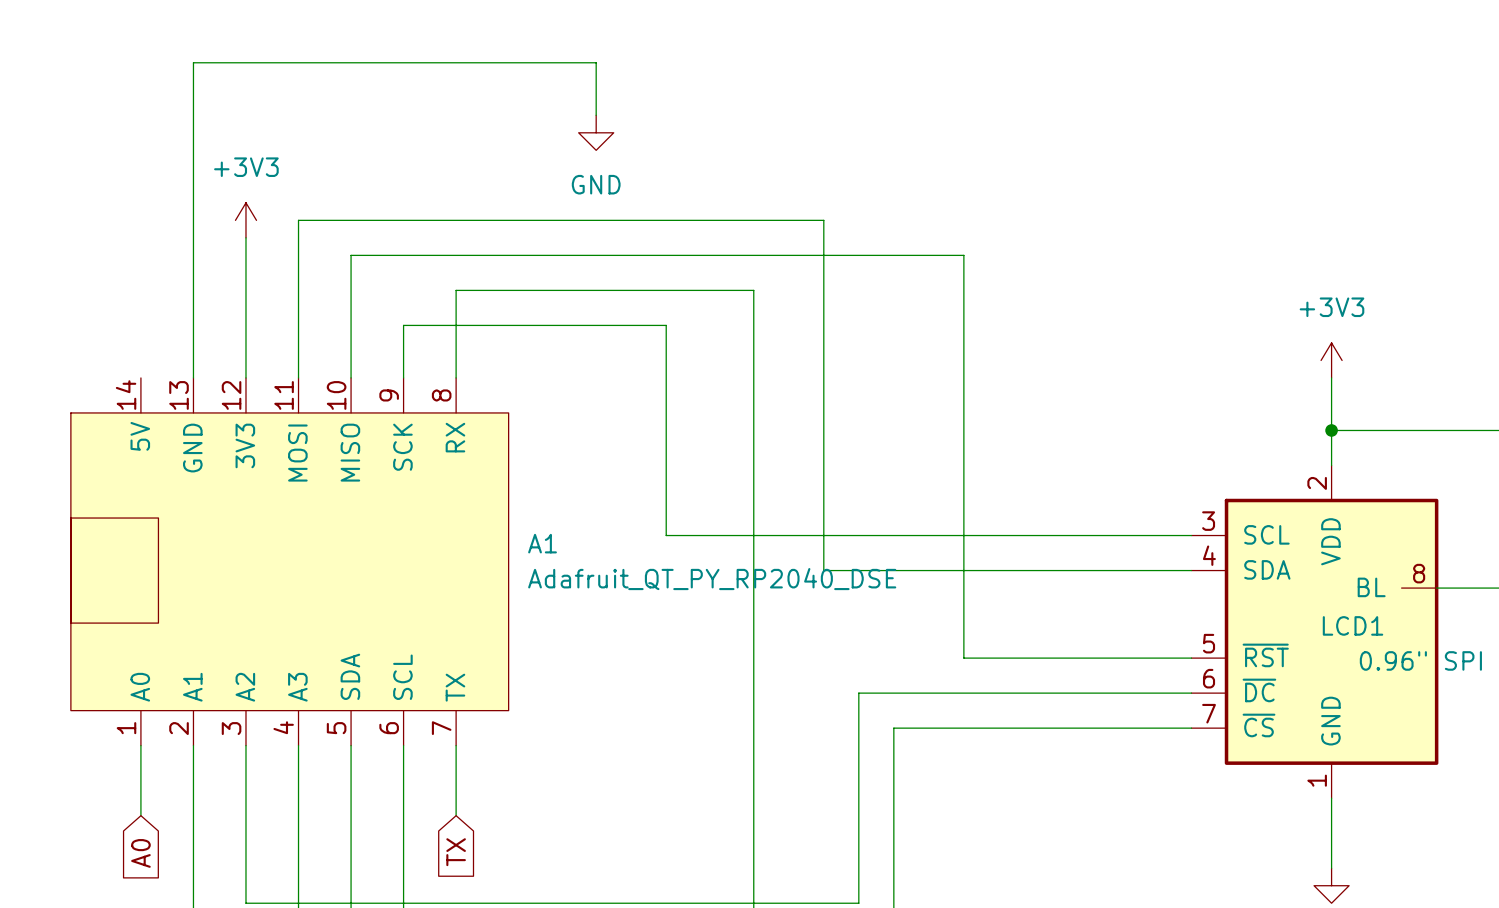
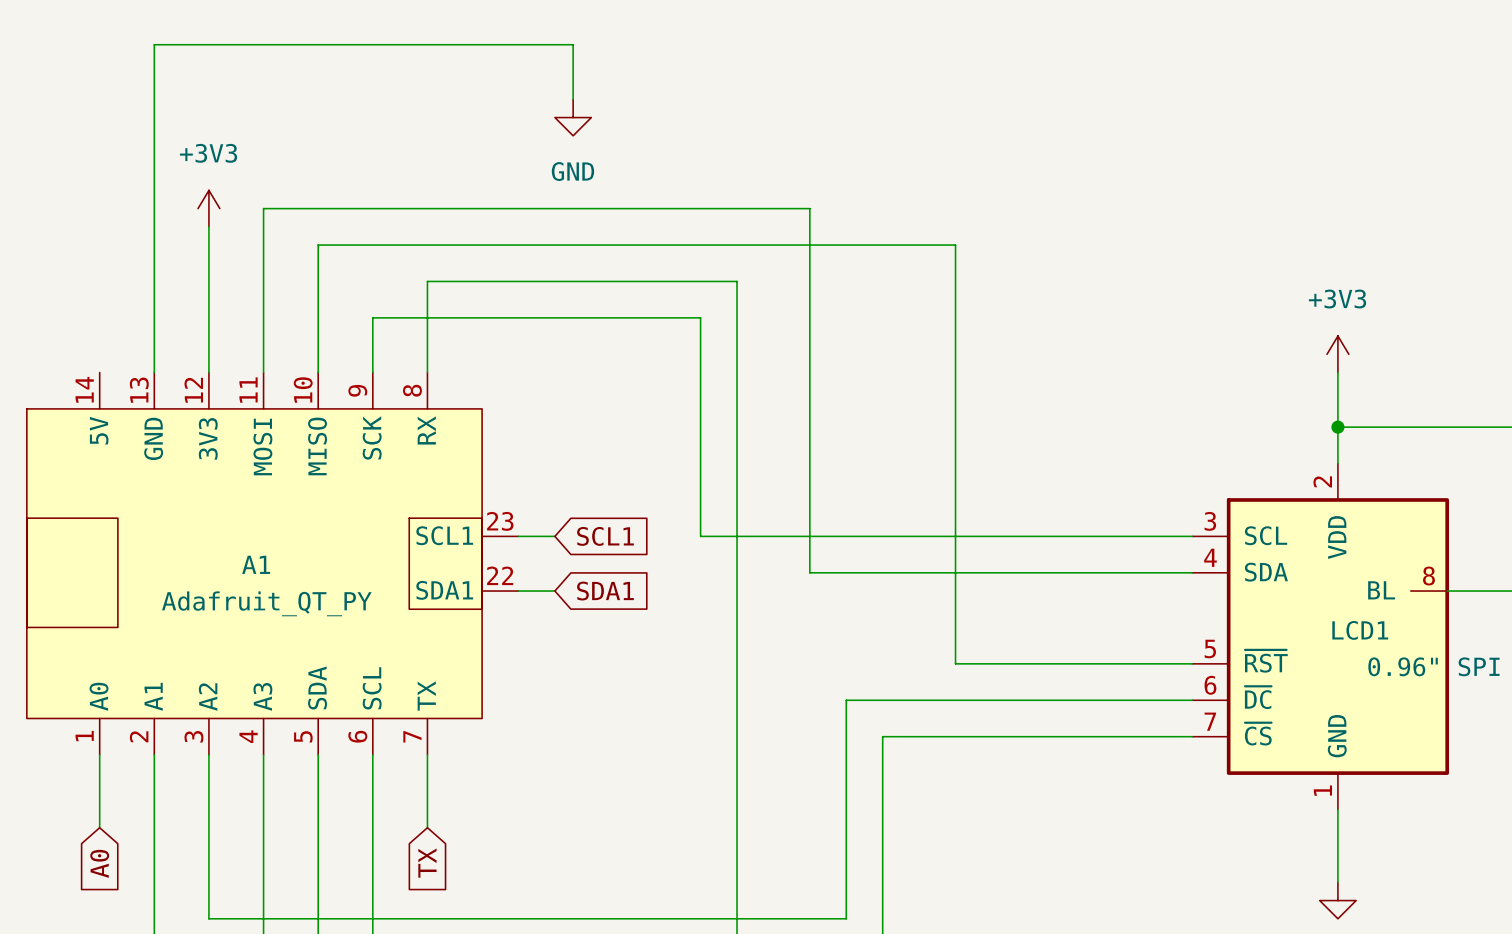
wire: (666, 325) (666, 535) (718, 535) -> (645, 317) (700, 317) (700, 536)
A1 symbol: [70, 377, 509, 746] -> [26, 372, 519, 755]
wire: none -> (518, 536) (554, 536)
global label: none -> SCL1 (605, 536)
A1 name position: A1 (542, 543) -> A1 (256, 564)
A1 value: Adafruit_QT_PY_RP2040_DSE (712, 579) -> Adafruit_QT_PY (266, 603)
wire: none -> (518, 591) (554, 591)
global label: none -> SDA1 (605, 591)

